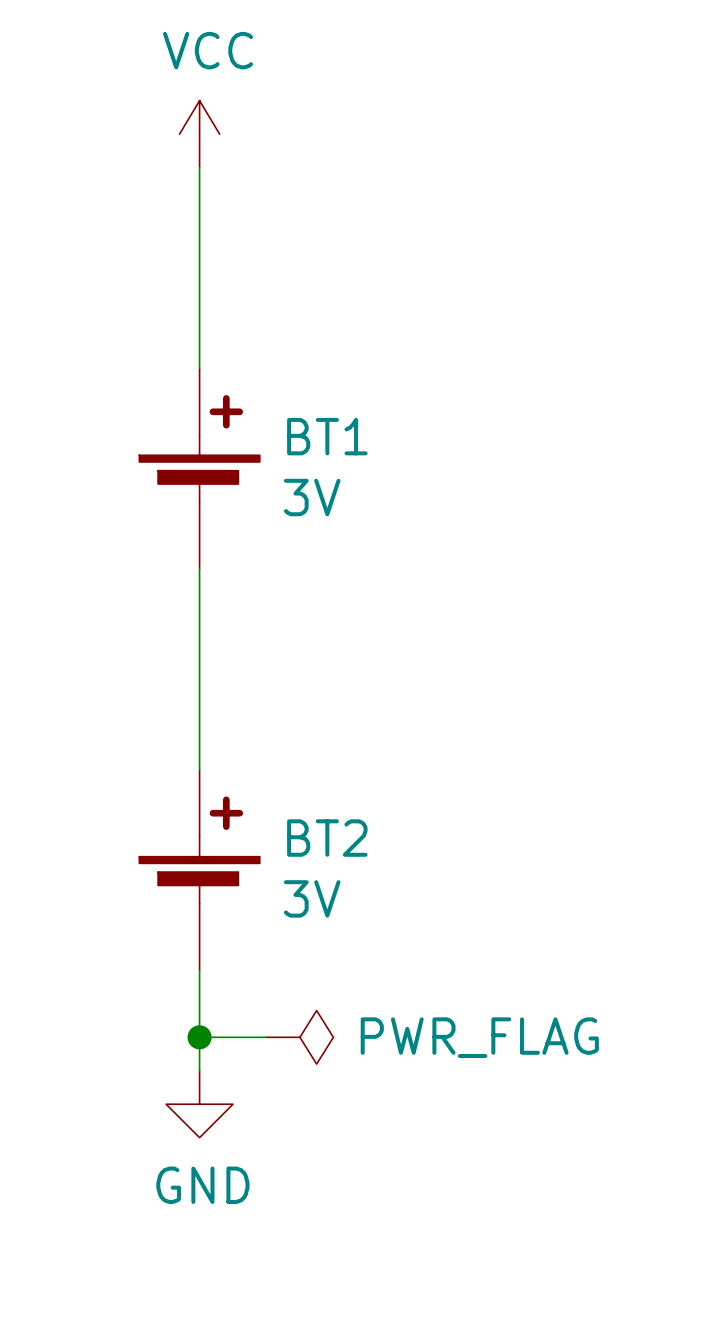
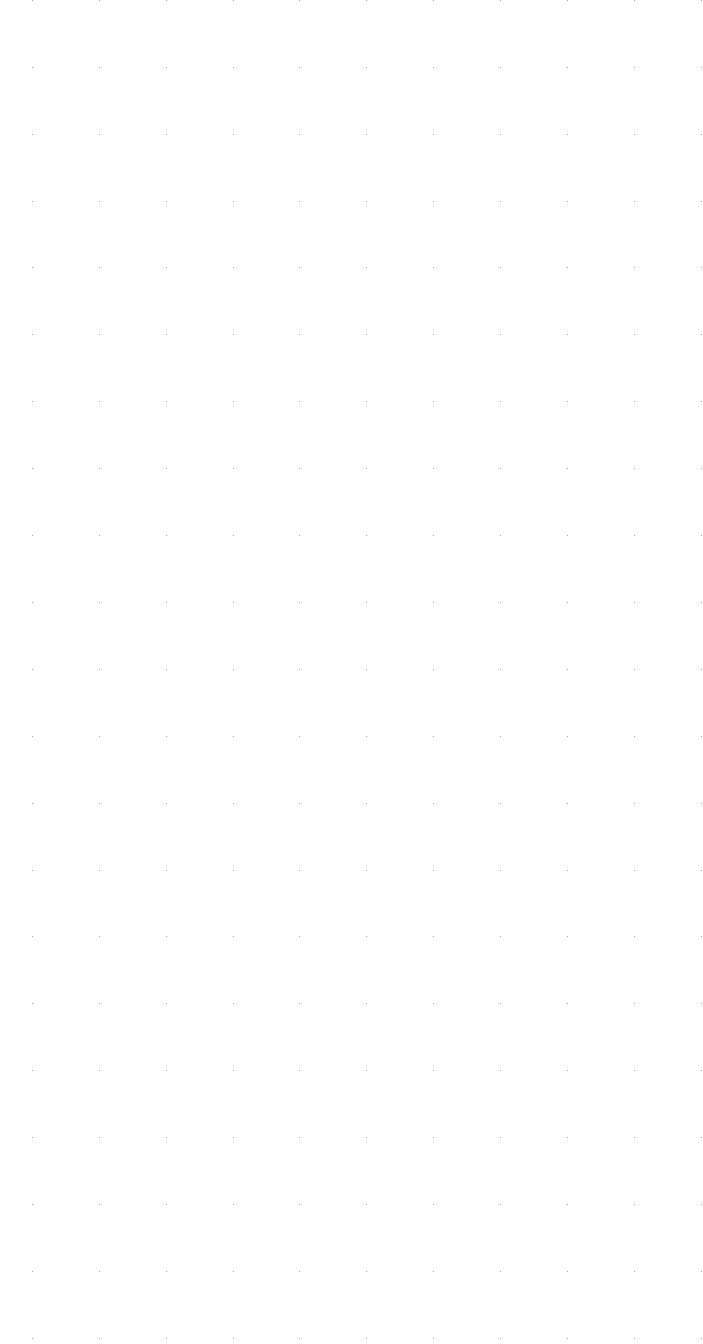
power symbol: VCC (199, 134) -> none
wire: (199, 167) (199, 368) -> none
BT1: 3V (199, 468) -> none
wire: (199, 569) (199, 769) -> none
BT2: 3V (199, 870) -> none
wire: (199, 970) (199, 1070) -> none
wire: (199, 1037) (266, 1037) -> none
junction: (199, 1037) -> none
power symbol: PWR_FLAG (299, 1037) -> none
power symbol: GND (199, 1104) -> none

